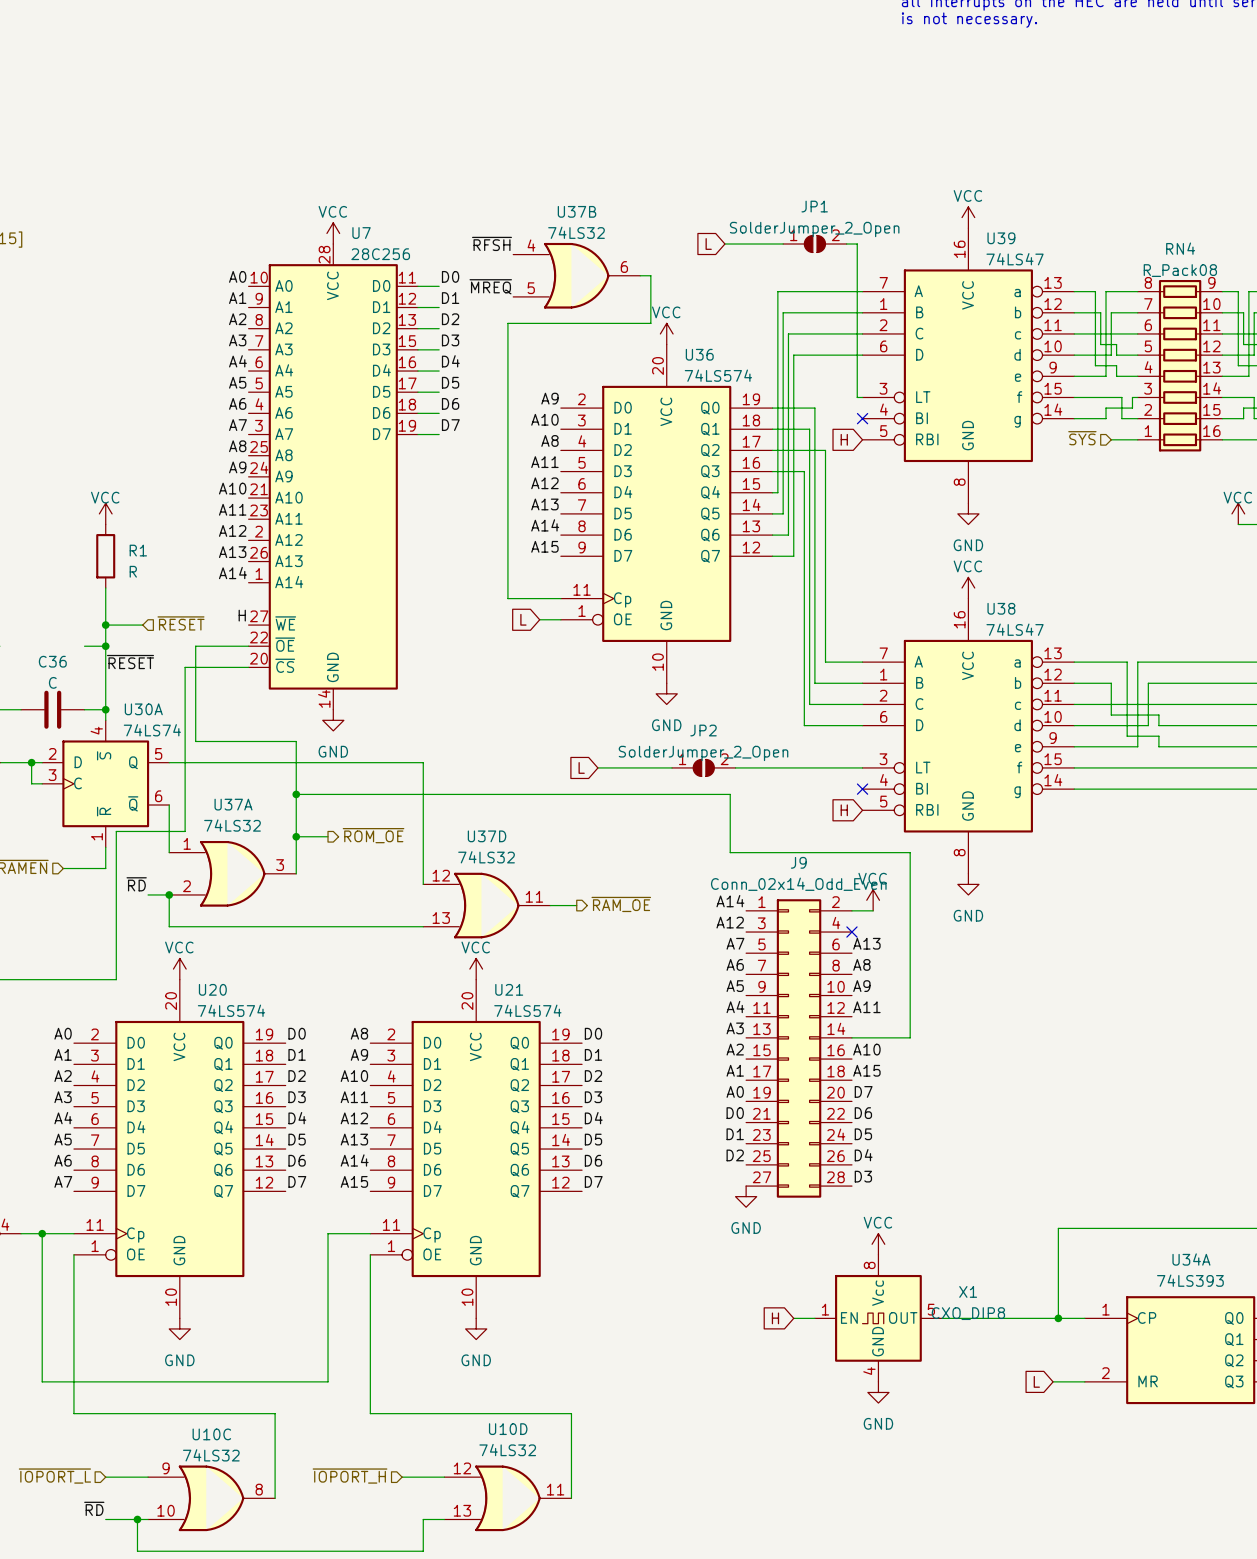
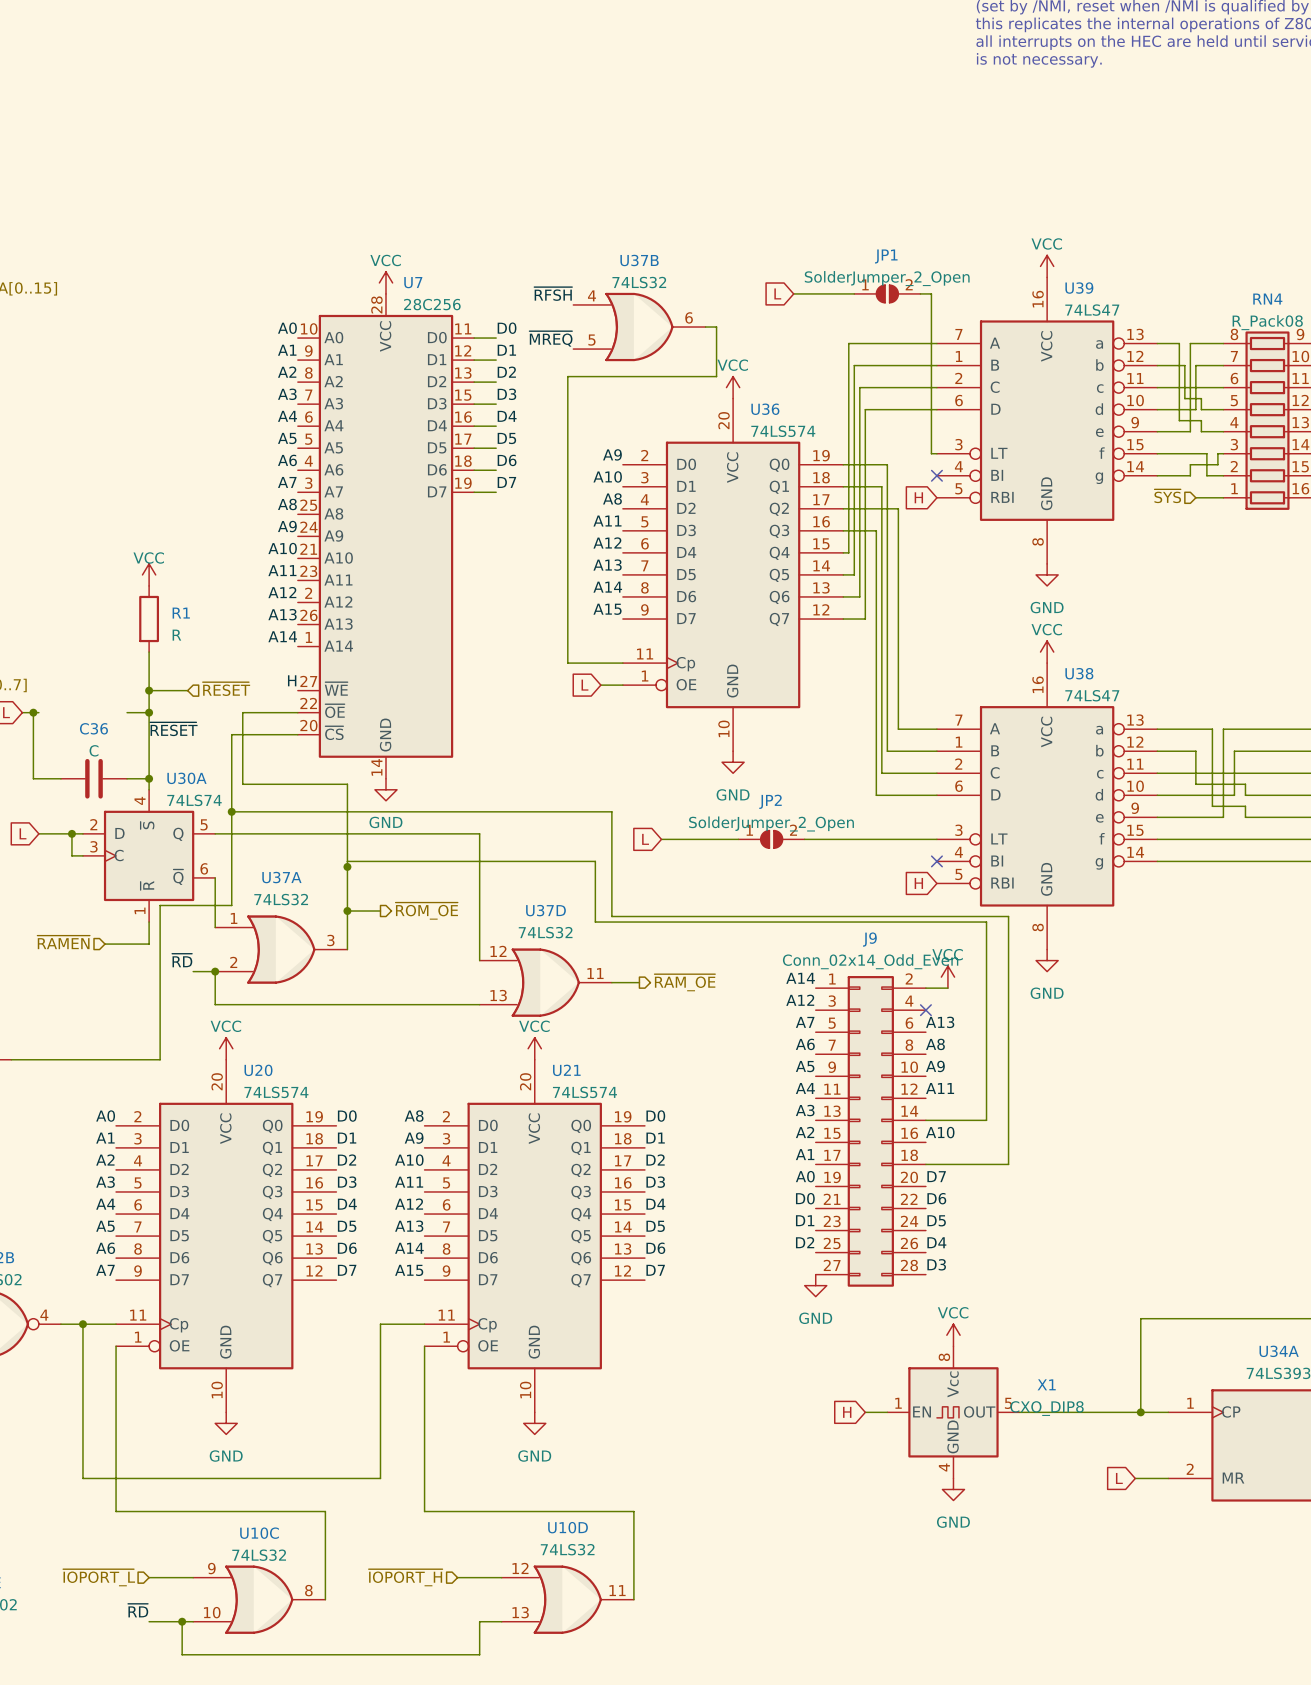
wire: (195, 715) (195, 741) -> (231, 811) (242, 811)
wire: none -> (242, 784) (347, 784) (347, 811) (611, 811) (611, 916) (1008, 916) (1008, 1164) (925, 1164)
junction: none -> (231, 811)
wire: (296, 794) (730, 794) (730, 852) (910, 852) -> (347, 861) (595, 861) (595, 922) (986, 922) (986, 927)
label: A15 (866, 1070) -> none

